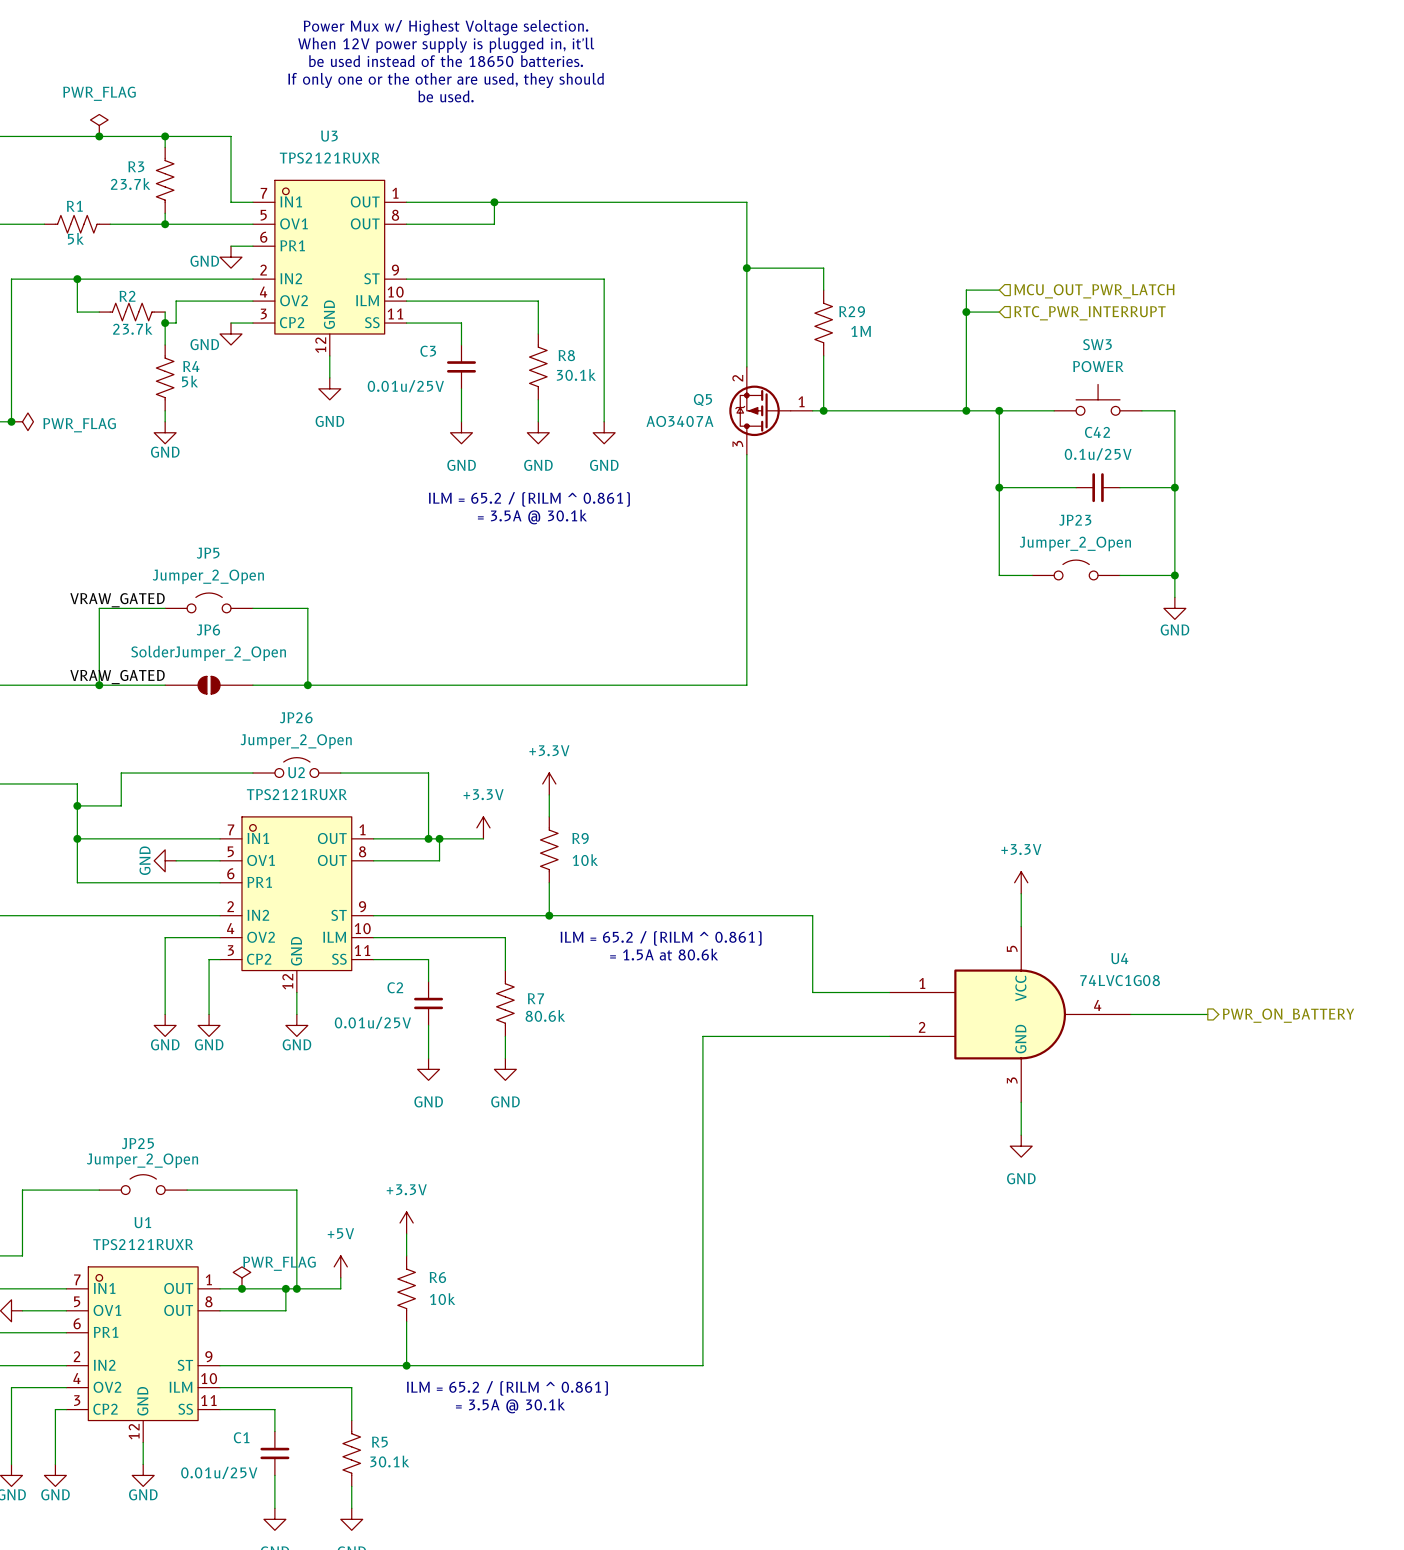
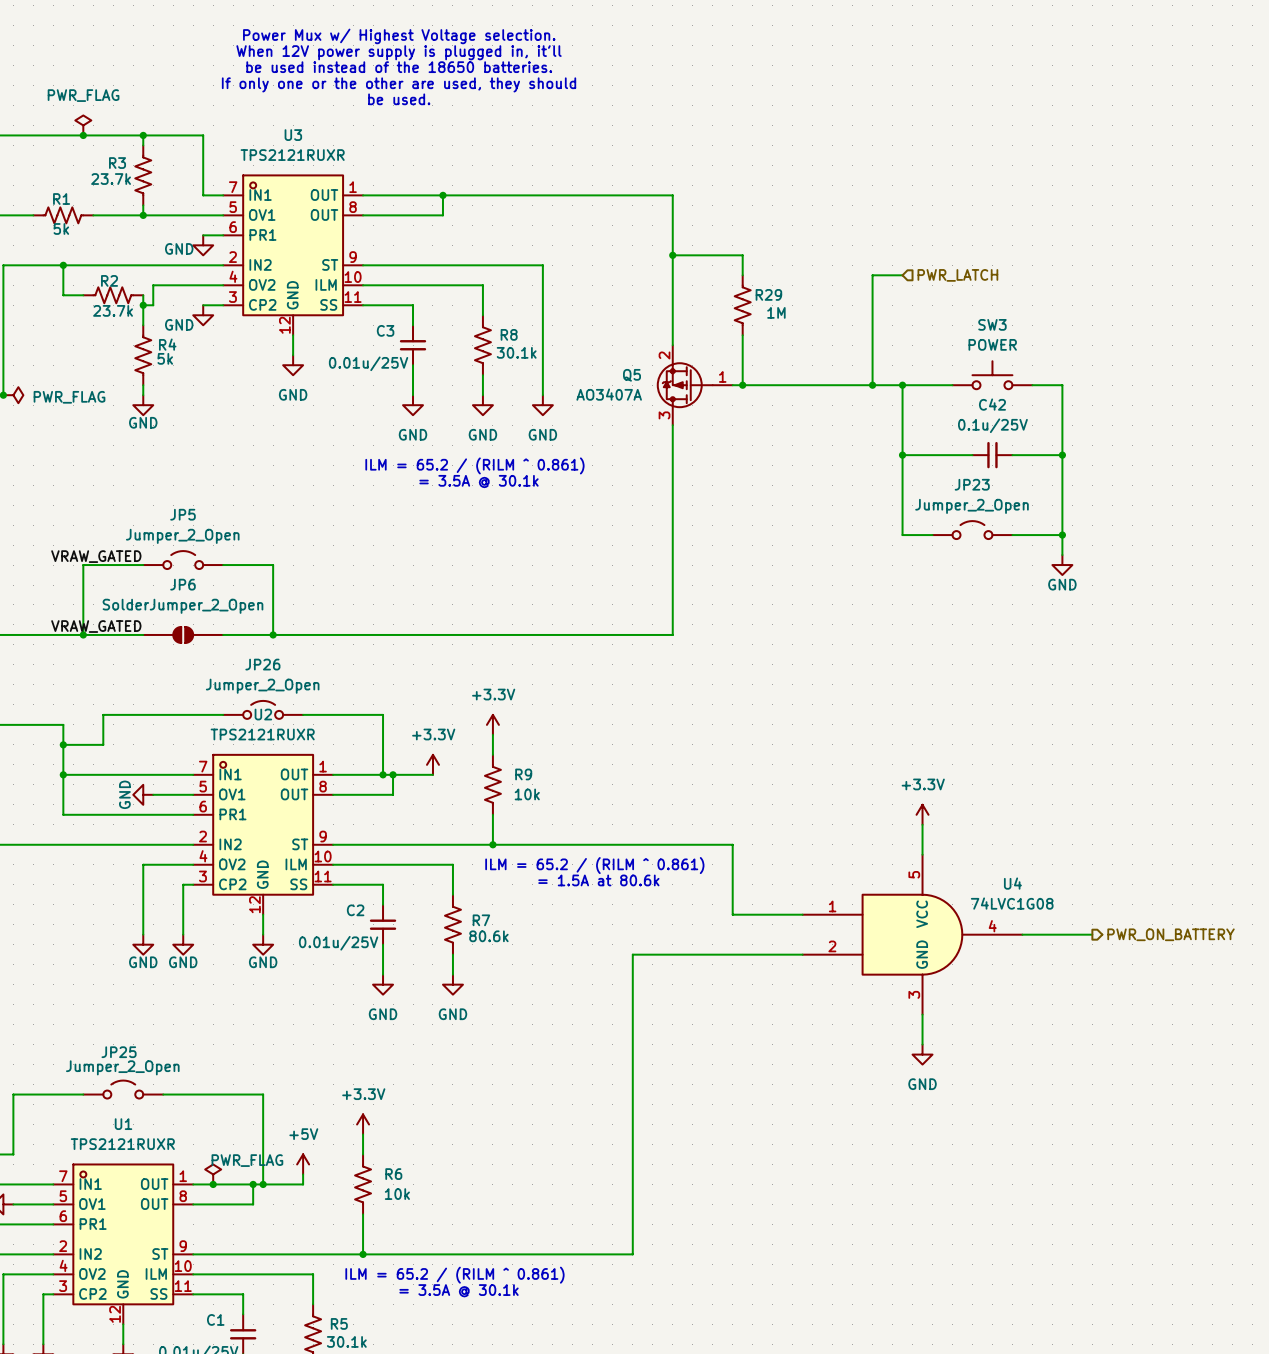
hierarchical label: MCU_OUT_PWR_LATCH (1094, 291) -> PWR_LATCH (957, 275)
wire: (966, 312) (999, 312) -> none
junction: (966, 312) -> none
hierarchical label: RTC_PWR_INTERRUPT (1090, 313) -> none

